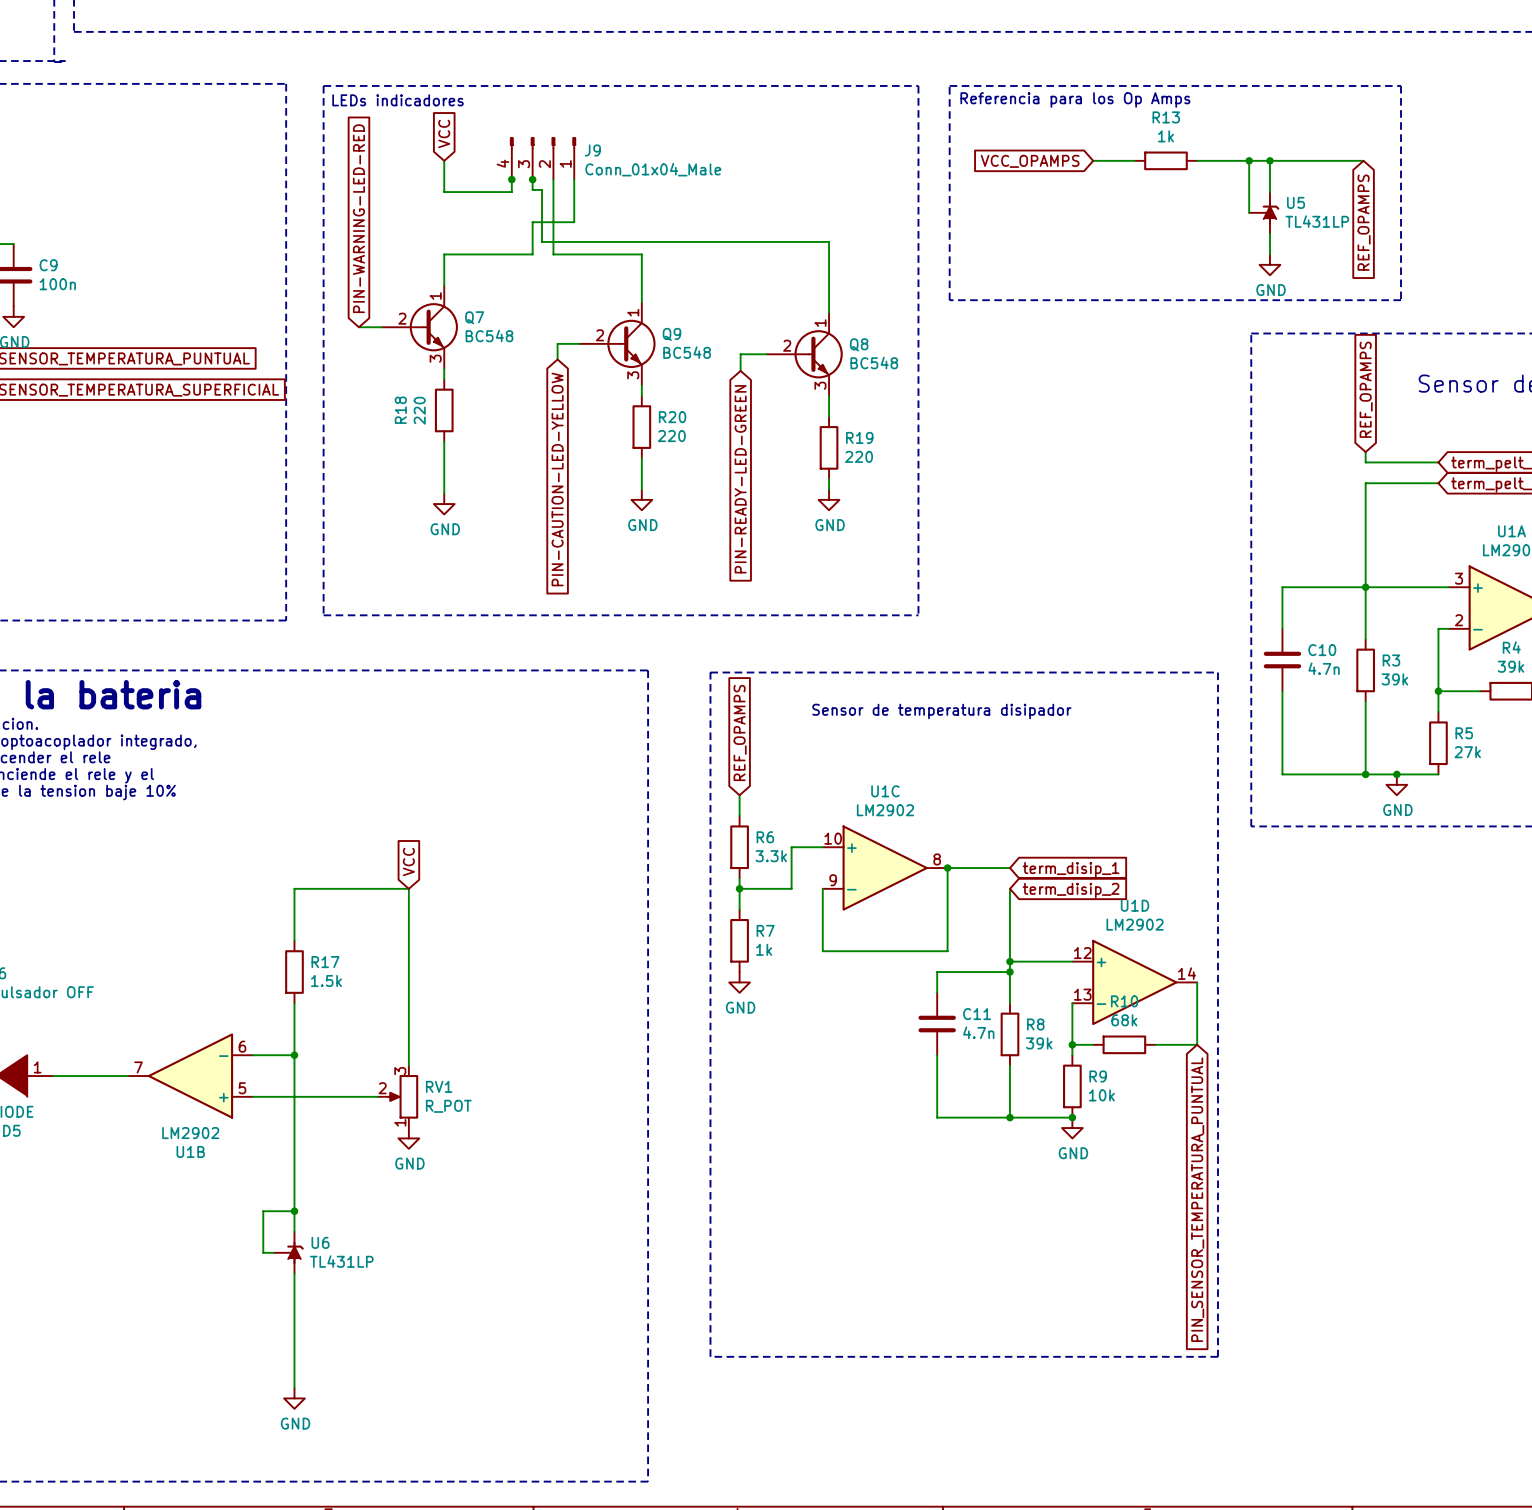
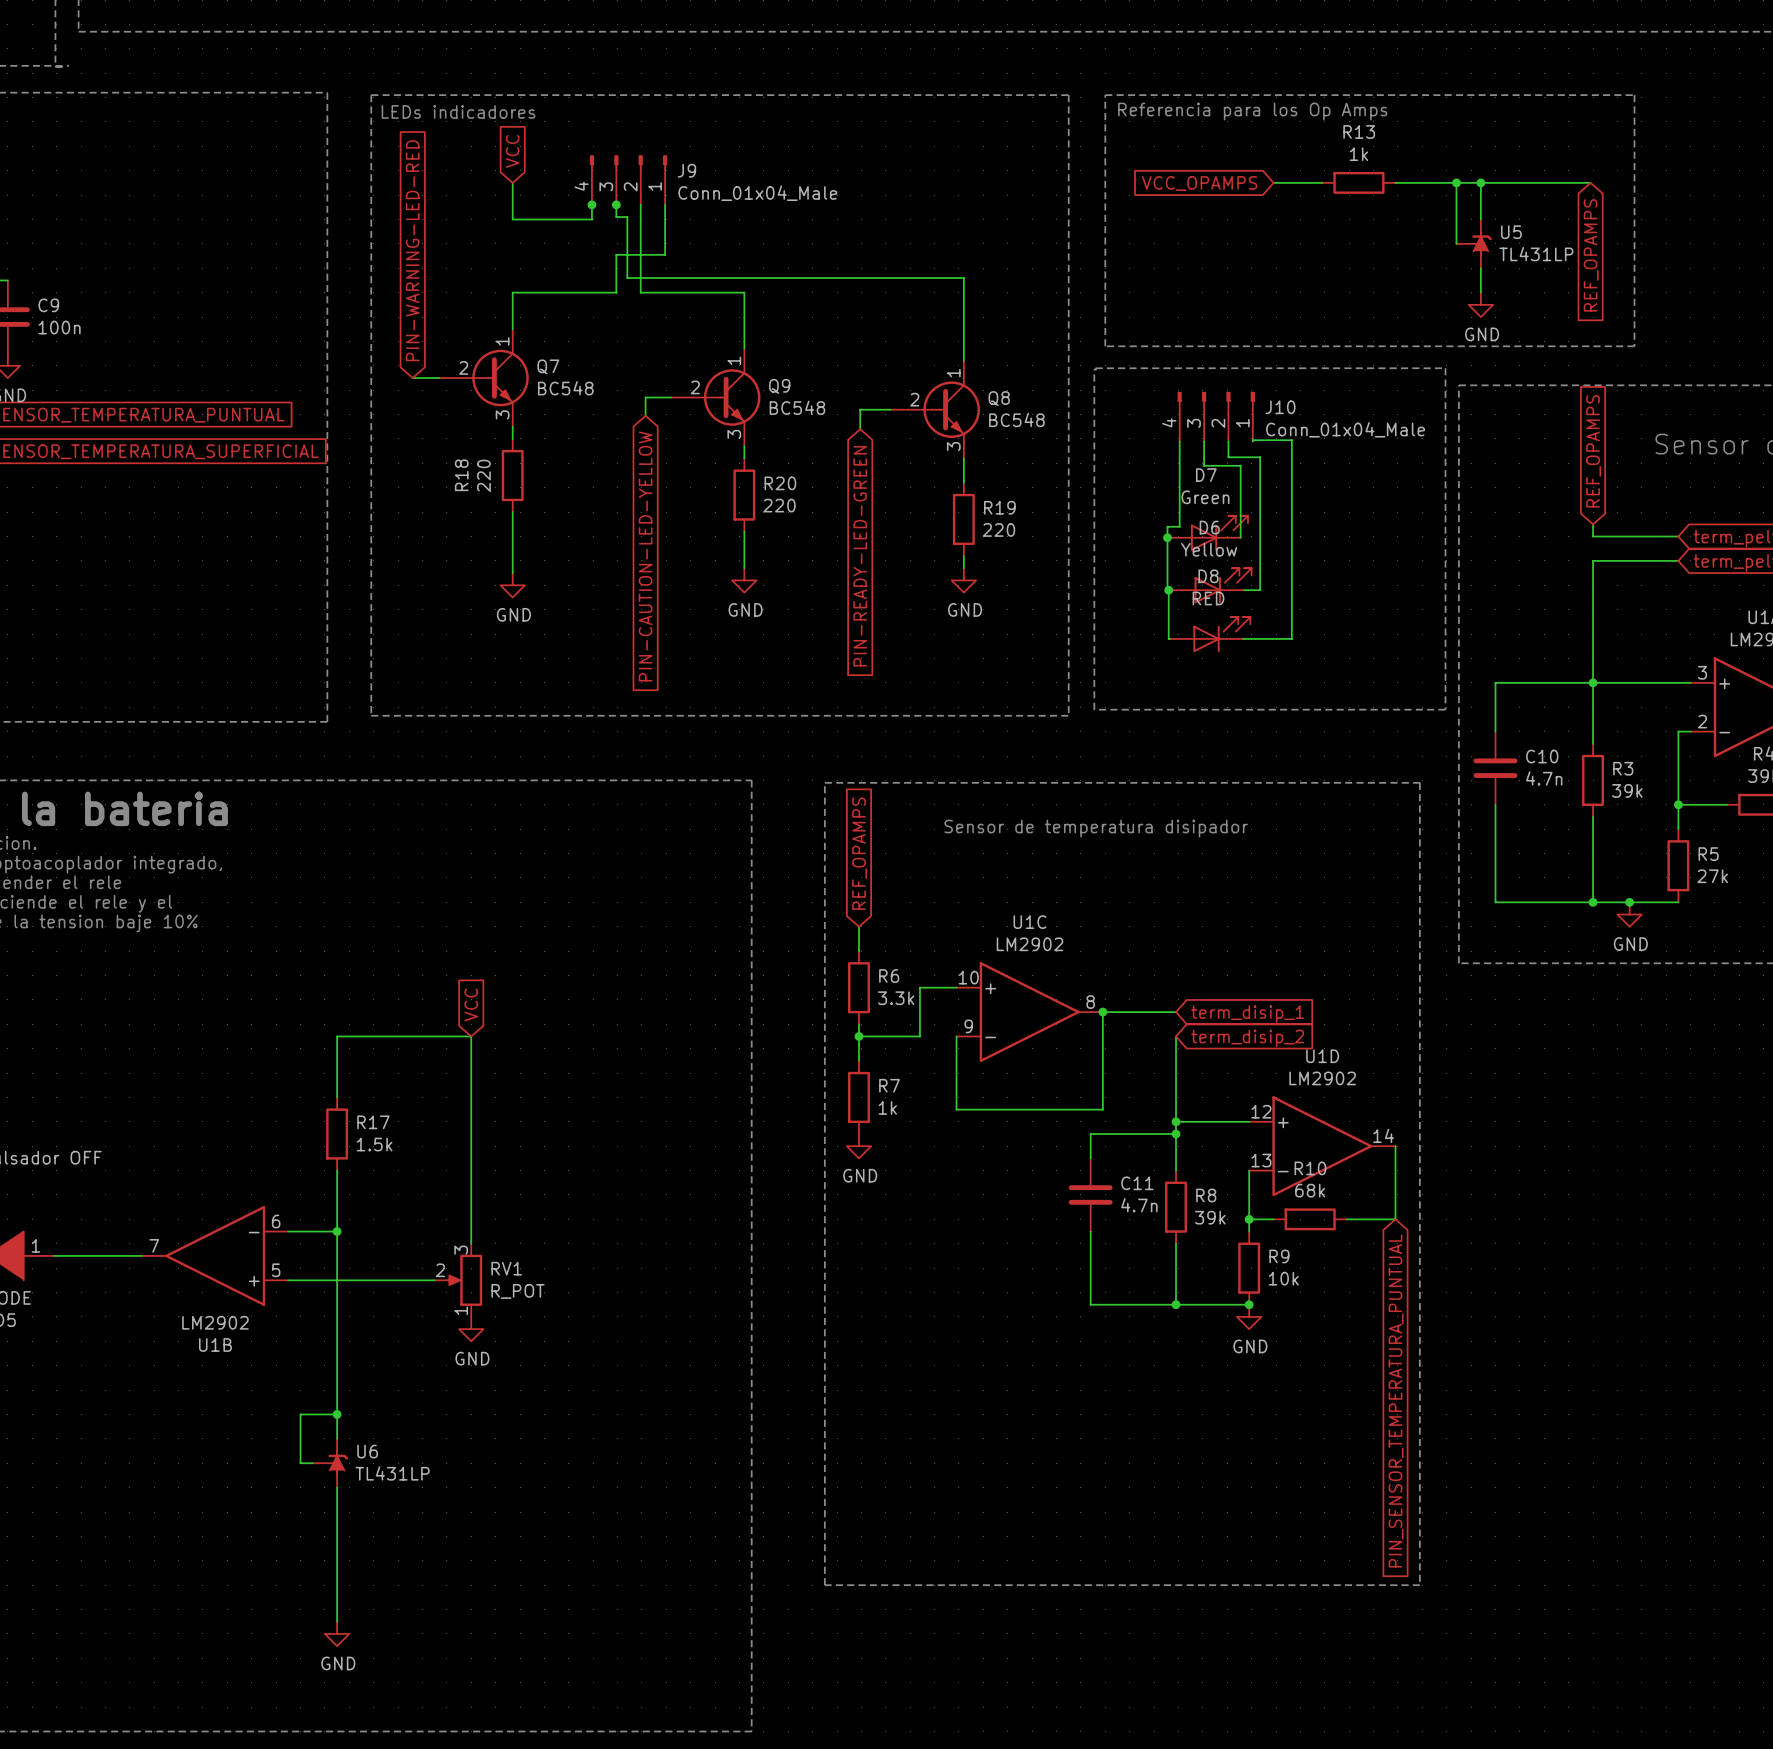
line: none -> (1095, 368) (1445, 368) (1445, 709) (1094, 709) (1094, 369) (1096, 369)
J10: none -> Conn_01x04_Male (1216, 416)
wire: none -> (1179, 441) (1179, 526) (1167, 526) (1167, 590) (1171, 590)
wire: none -> (1204, 441) (1204, 465) (1240, 465) (1240, 537)
wire: none -> (1228, 441) (1228, 457) (1260, 457) (1260, 590) (1244, 590)
wire: none -> (1252, 441) (1291, 440) (1291, 638) (1243, 638)
D7: none -> Green (1207, 533)
junction: none -> (1167, 537)
D6: none -> Yellow (1211, 585)
wire: none -> (1168, 590) (1169, 638)
junction: none -> (1168, 590)
D8: none -> RED (1210, 634)

